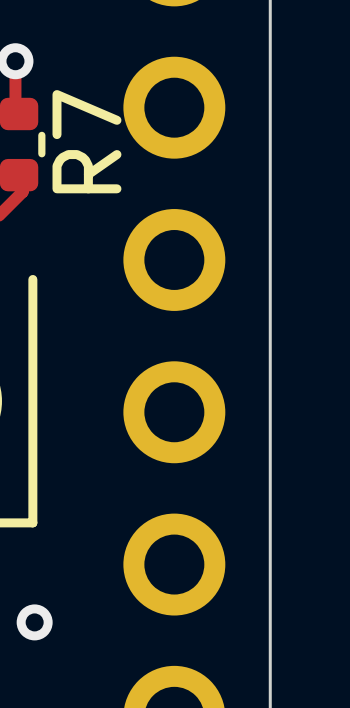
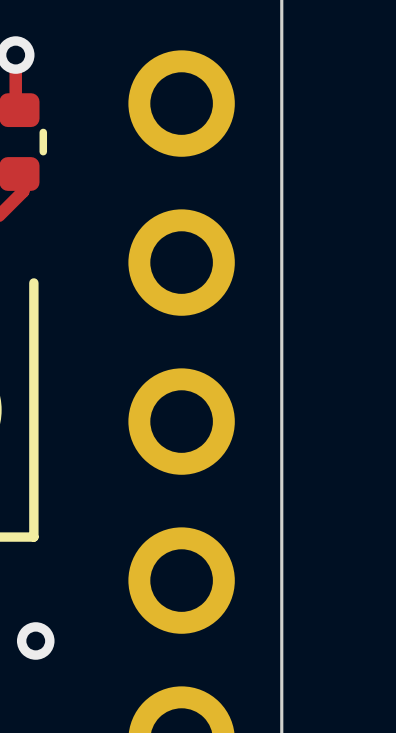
R7 name: R7 (86, 141) -> none

